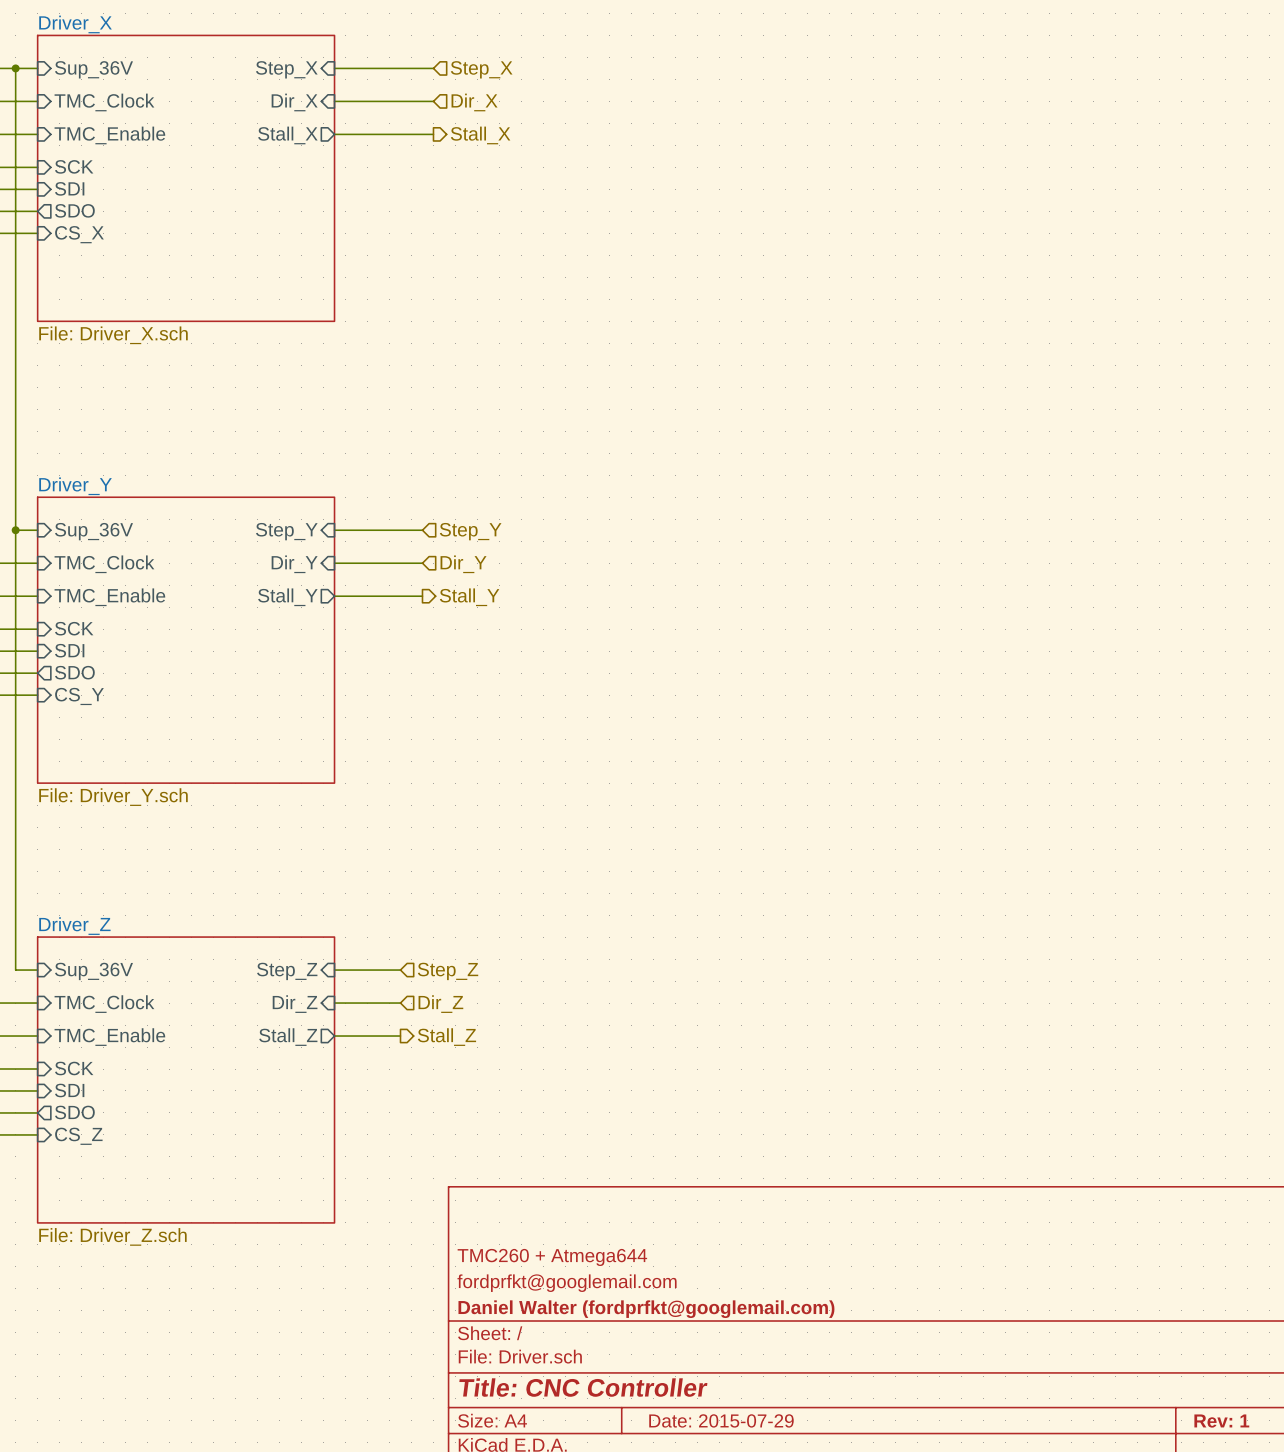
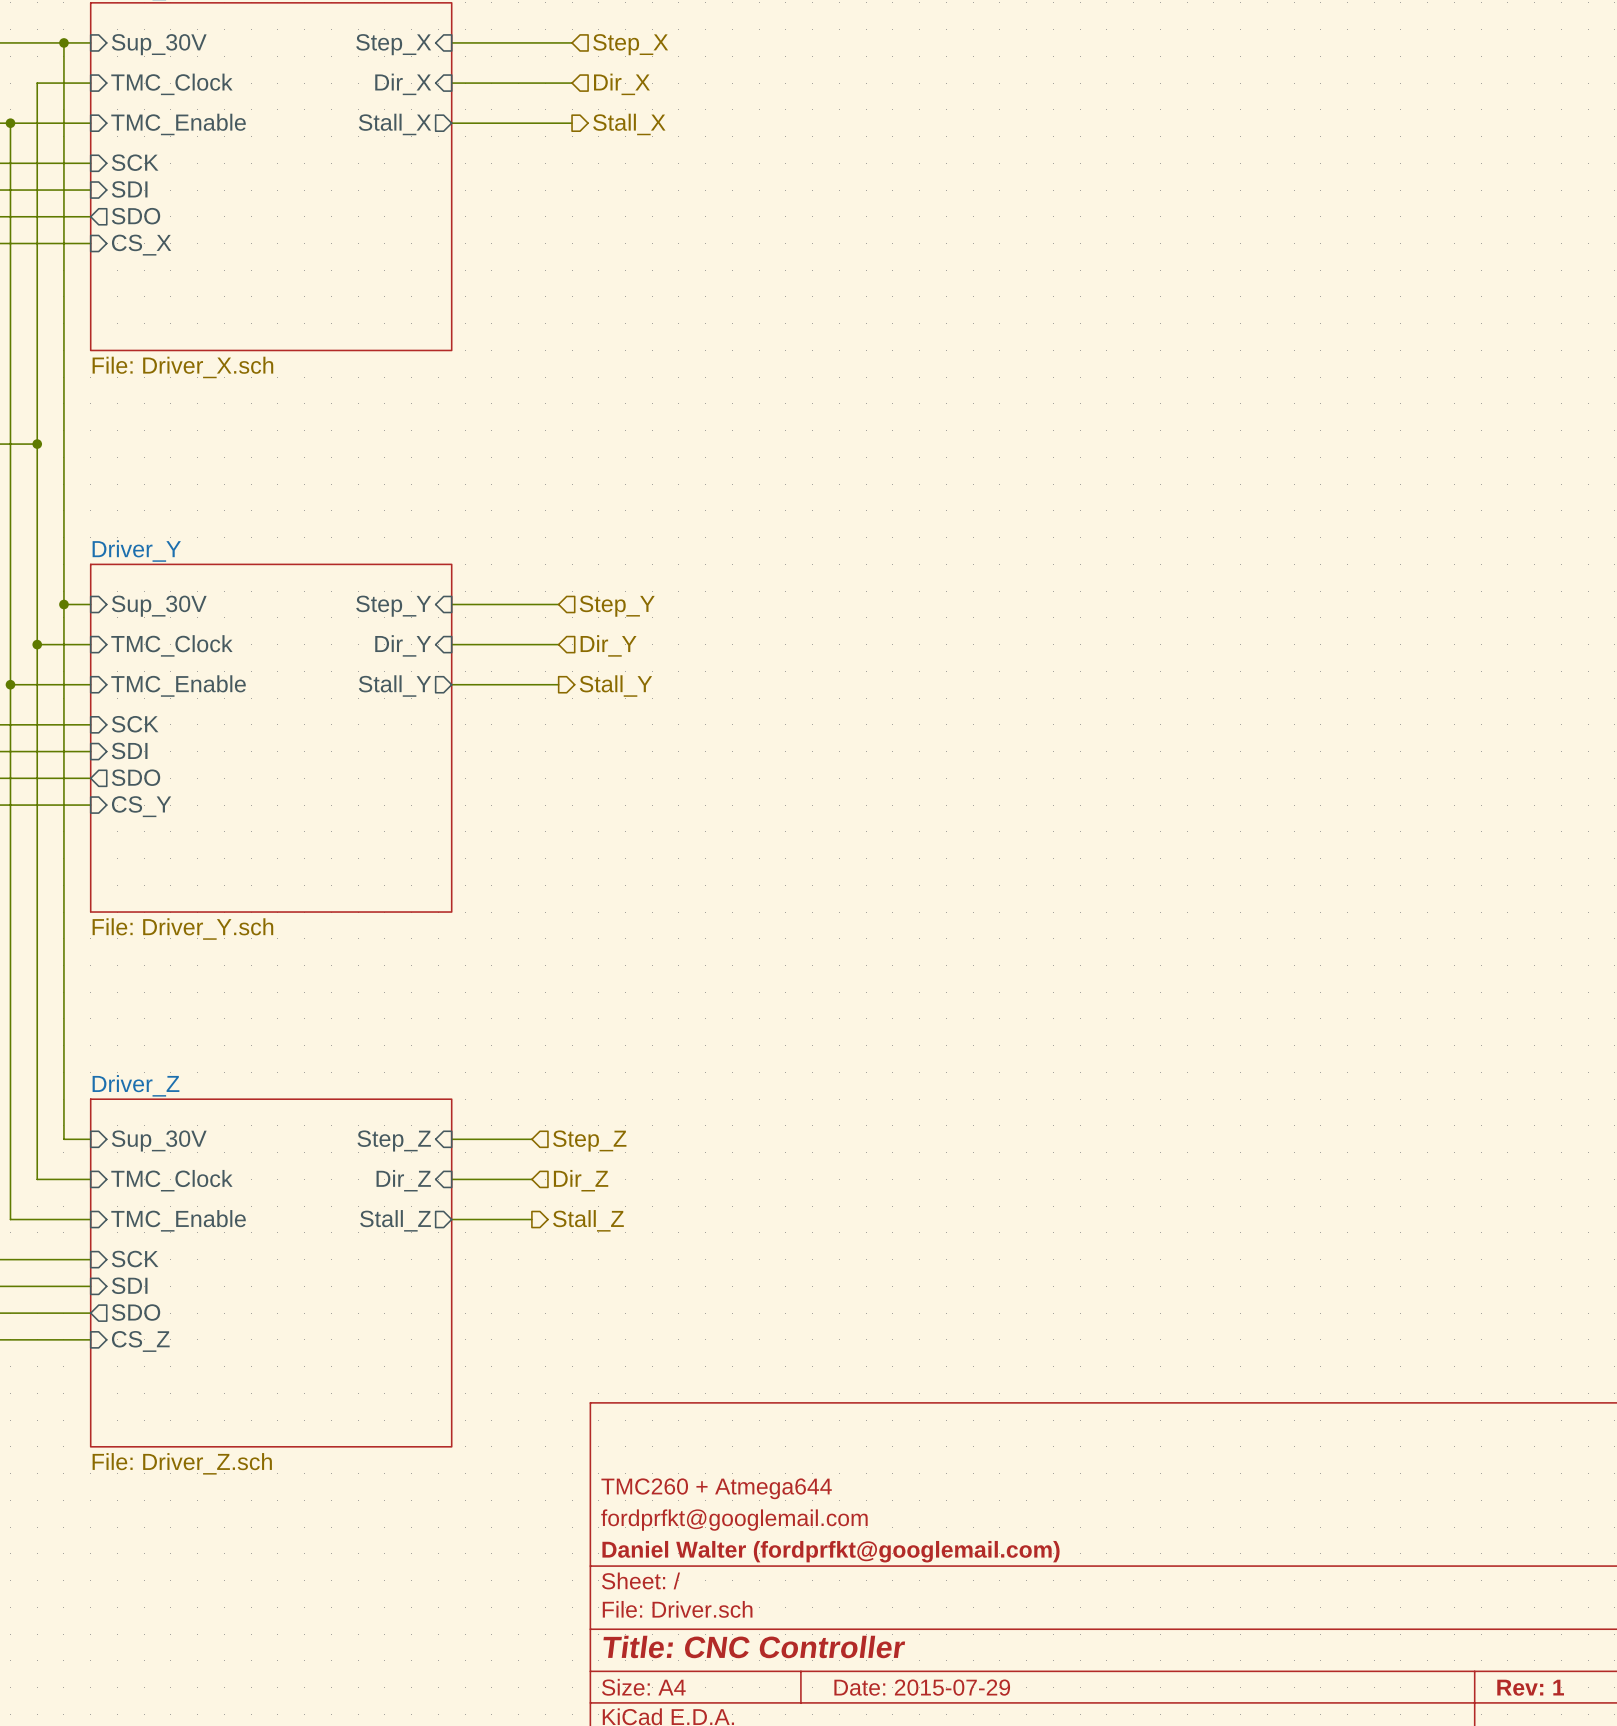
sheet pin: Sup_36V (93, 69) -> Sup_30V (159, 44)
sheet pin: Sup_36V (93, 531) -> Sup_30V (159, 606)
sheet pin: Sup_36V (93, 971) -> Sup_30V (159, 1141)

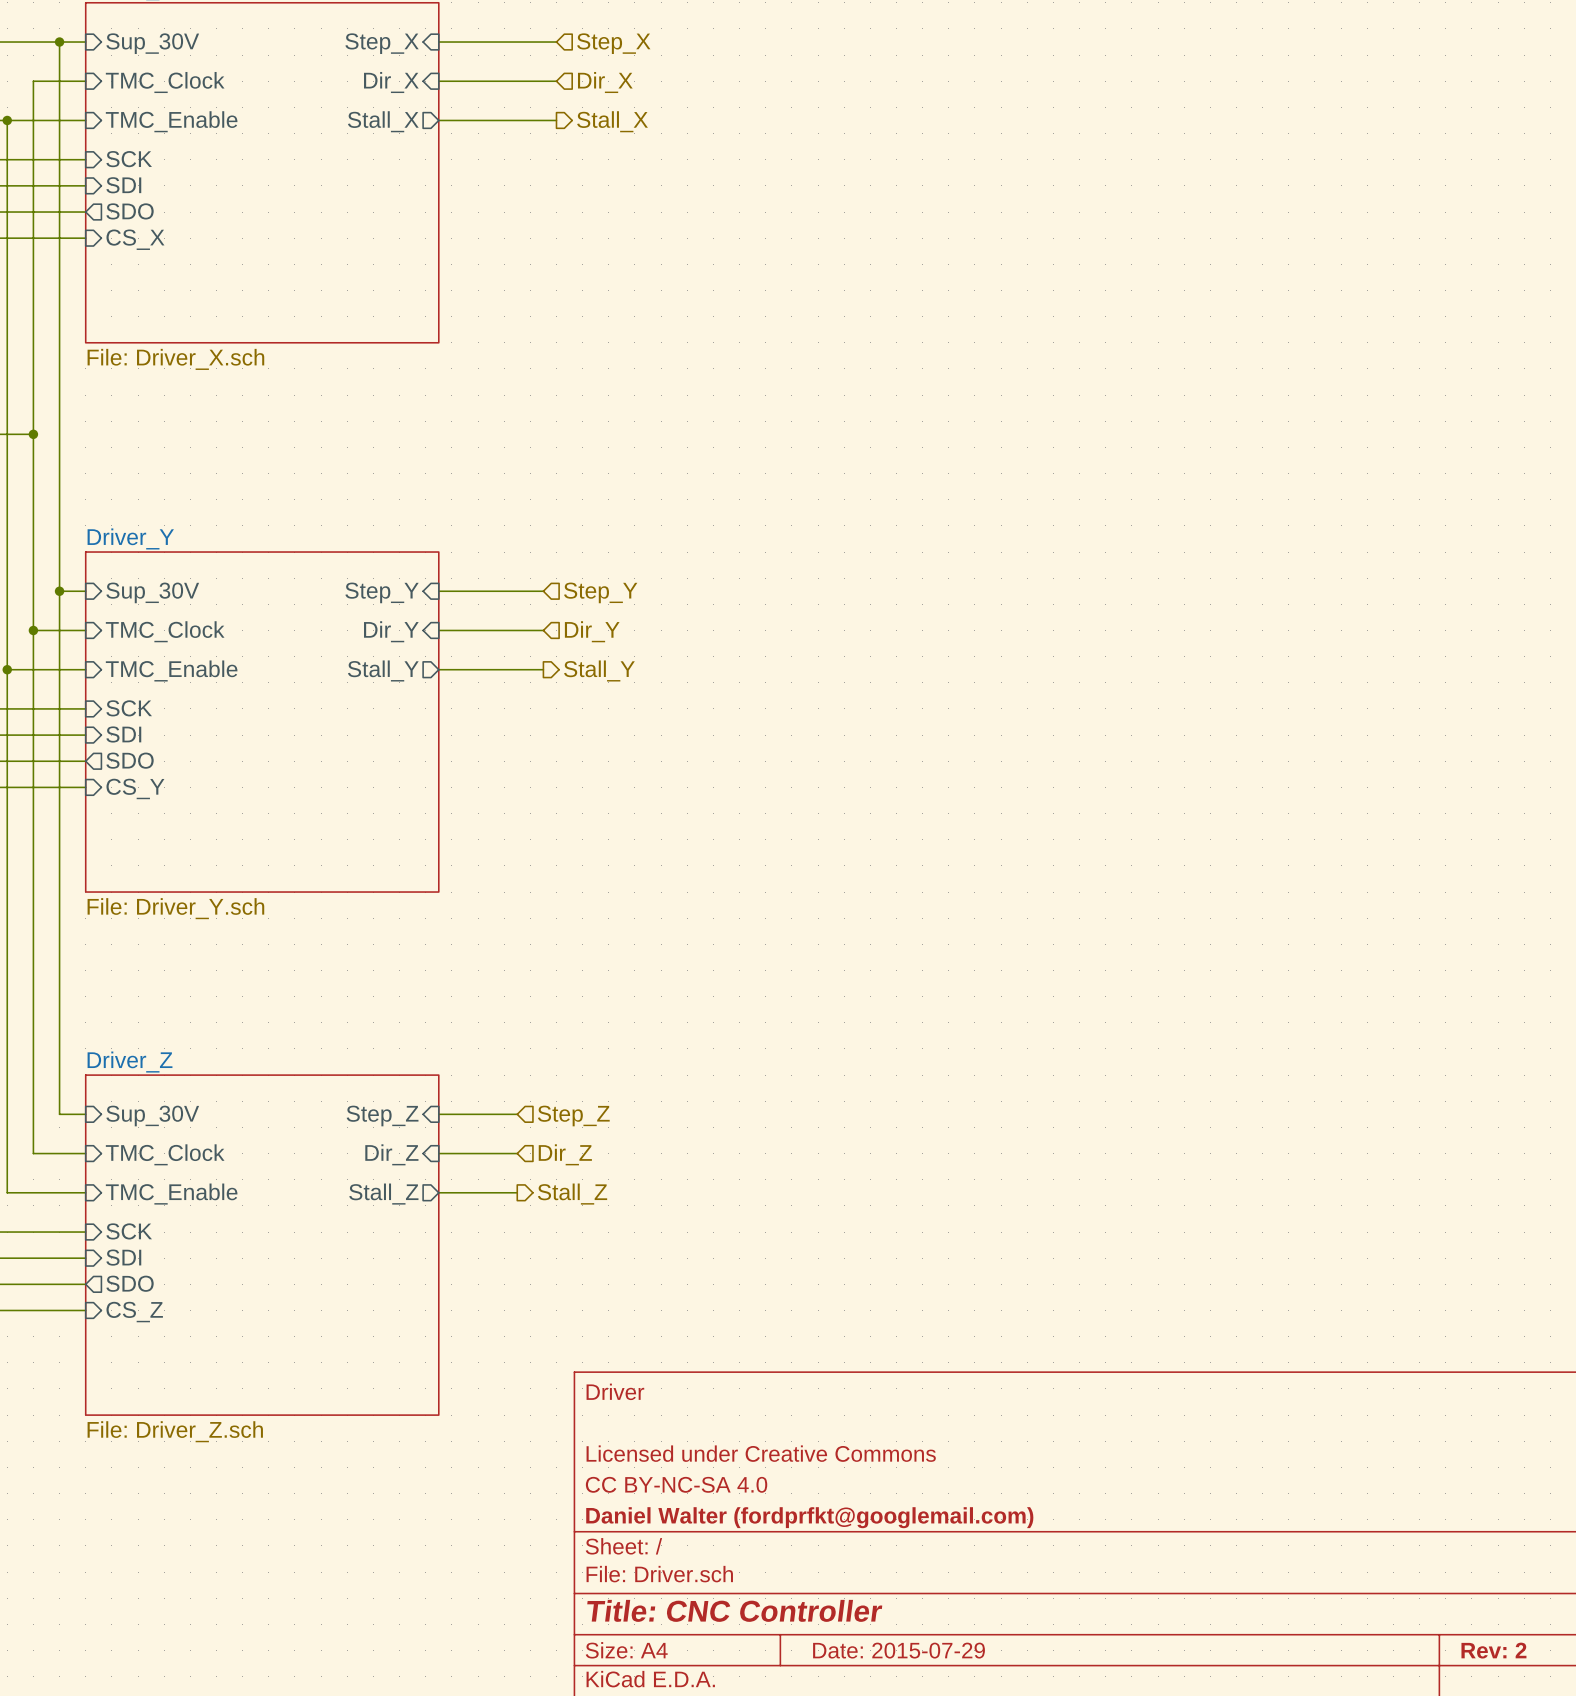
title block: none -> Driver (615, 1391)
title block: TMC260 + Atmega644 (716, 1488) -> Licensed under Creative Commons (761, 1453)
title block: fordprfkt@googlemail.com (734, 1520) -> CC BY-NC-SA 4.0 (676, 1484)
title block: Rev: 1 (1530, 1687) -> Rev: 2 (1493, 1650)

